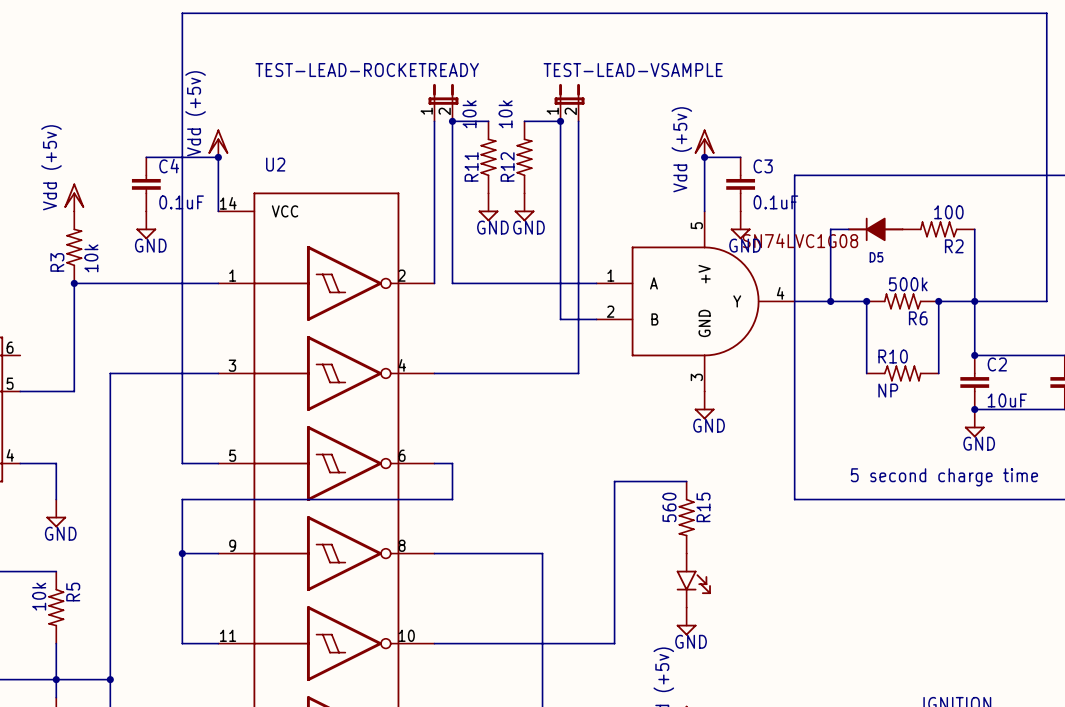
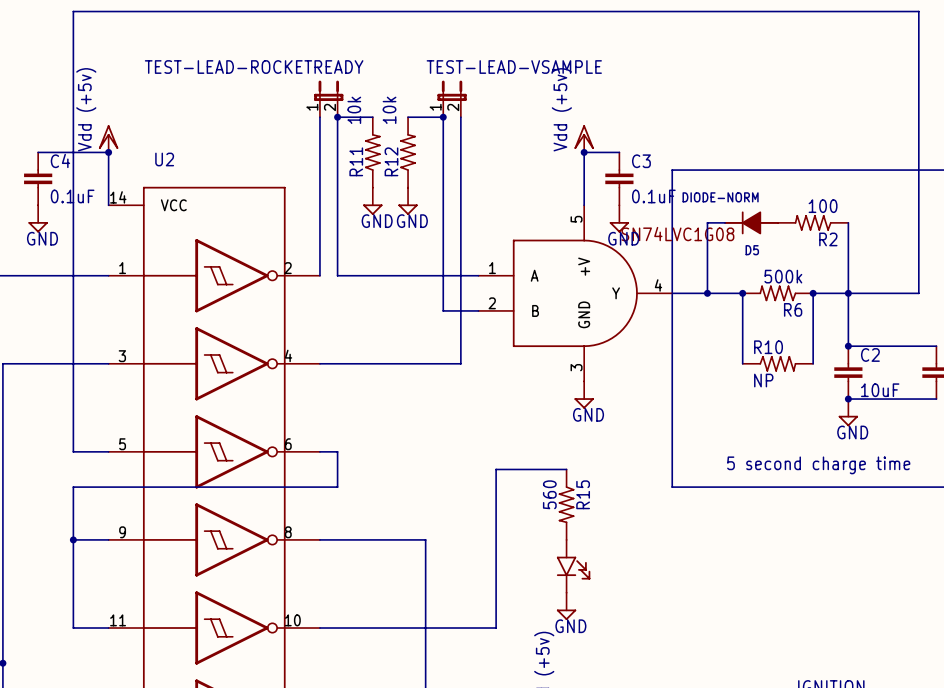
power symbol text position: Vdd (+5v) (681, 149) -> Vdd (+5v) (561, 109)
D5 value: none -> DIODE-NORM (720, 197)

